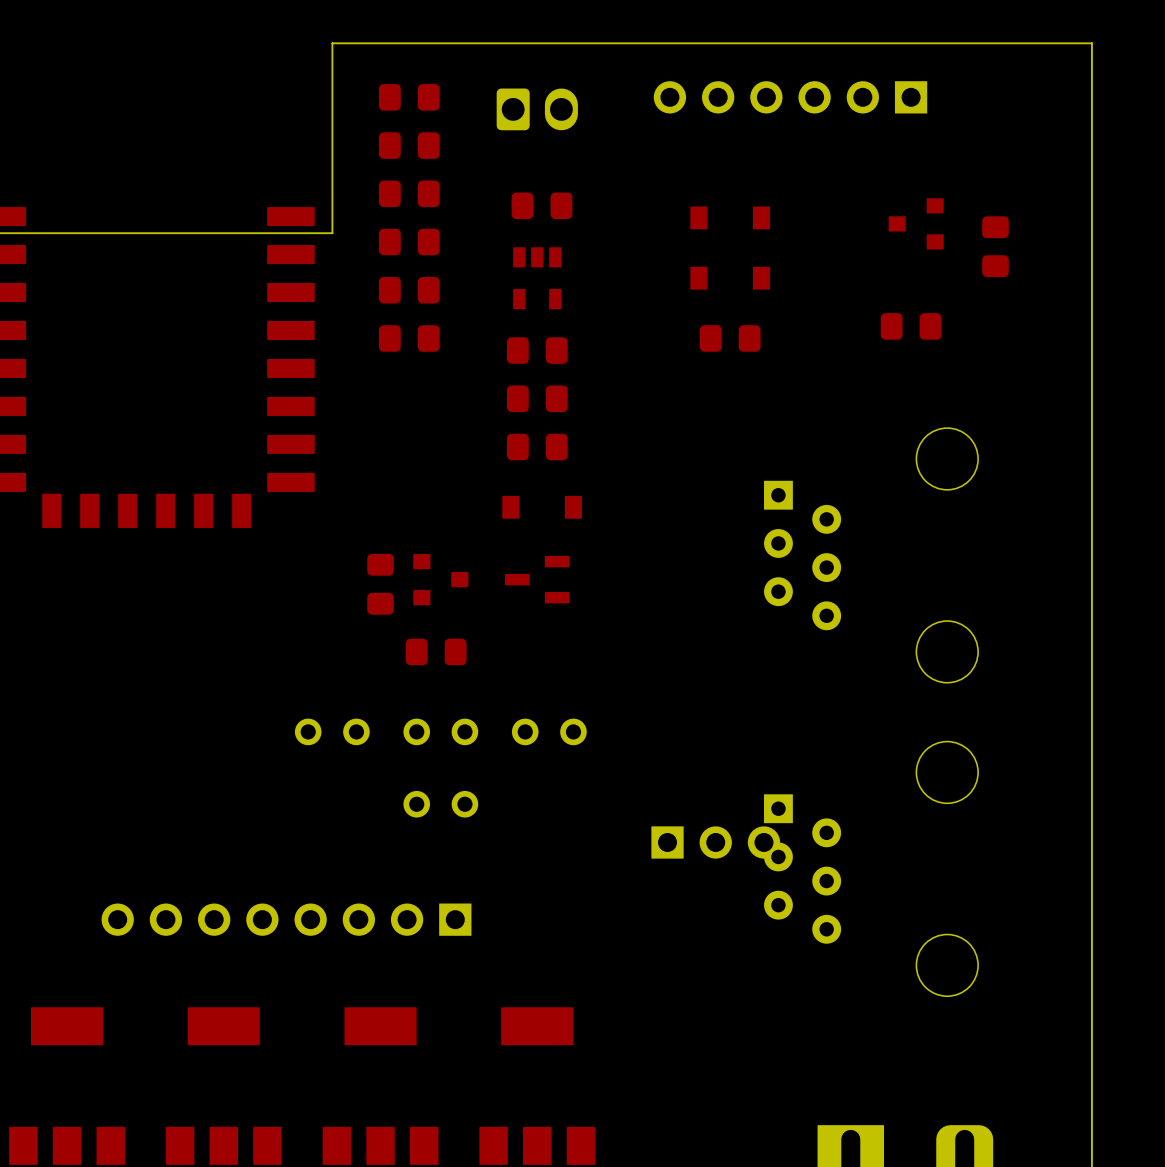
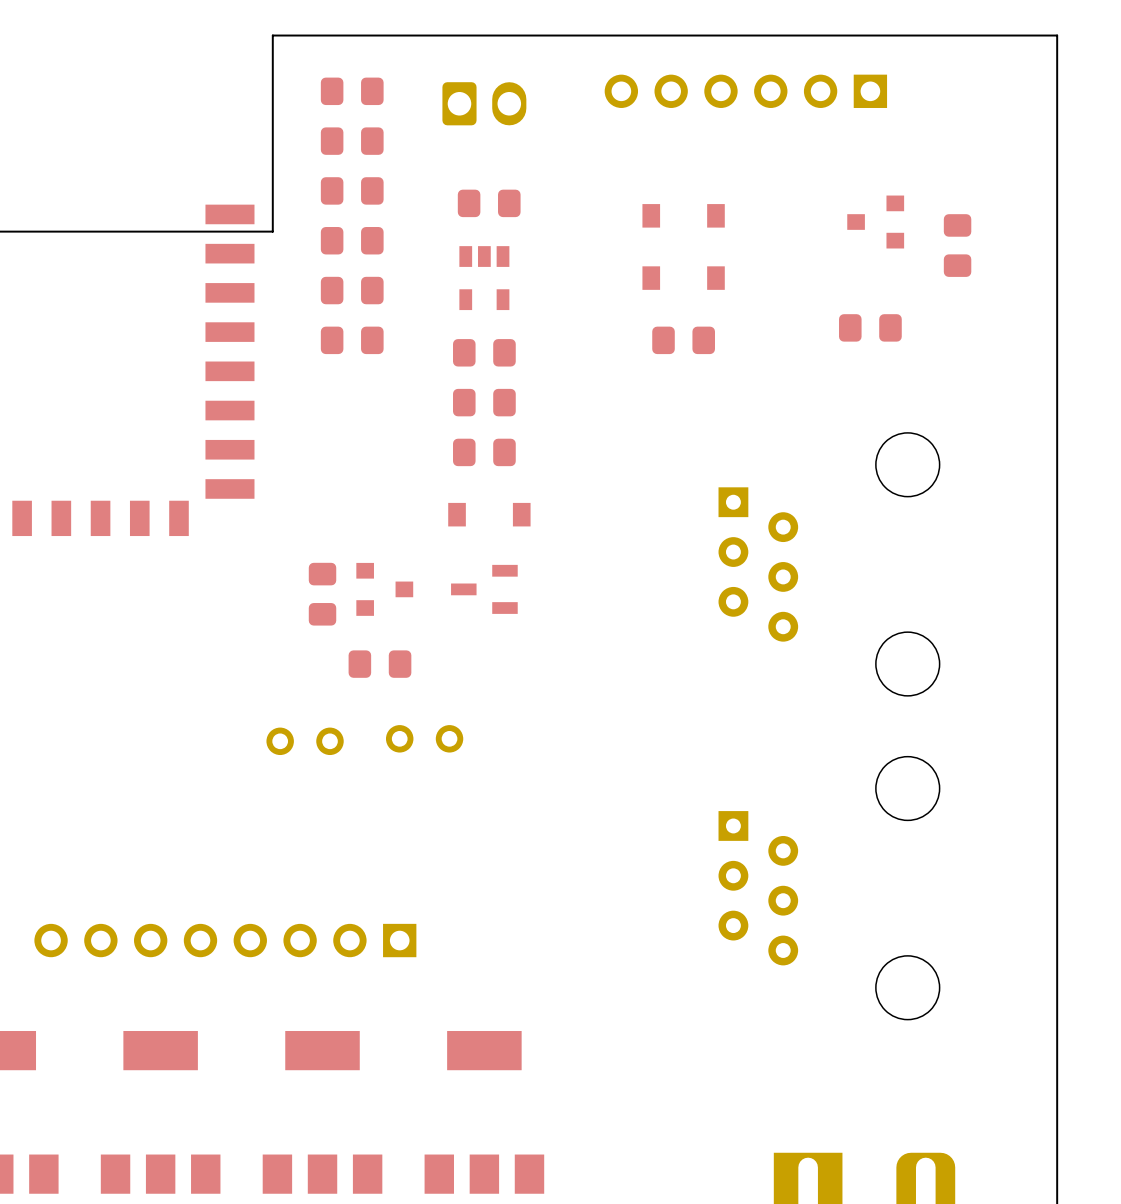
part: none -> (424, 738)
part position: (332, 731) -> (305, 741)
part: (440, 731) -> none
part: (549, 731) -> none
part: (440, 804) -> none
part: (715, 842) -> none

